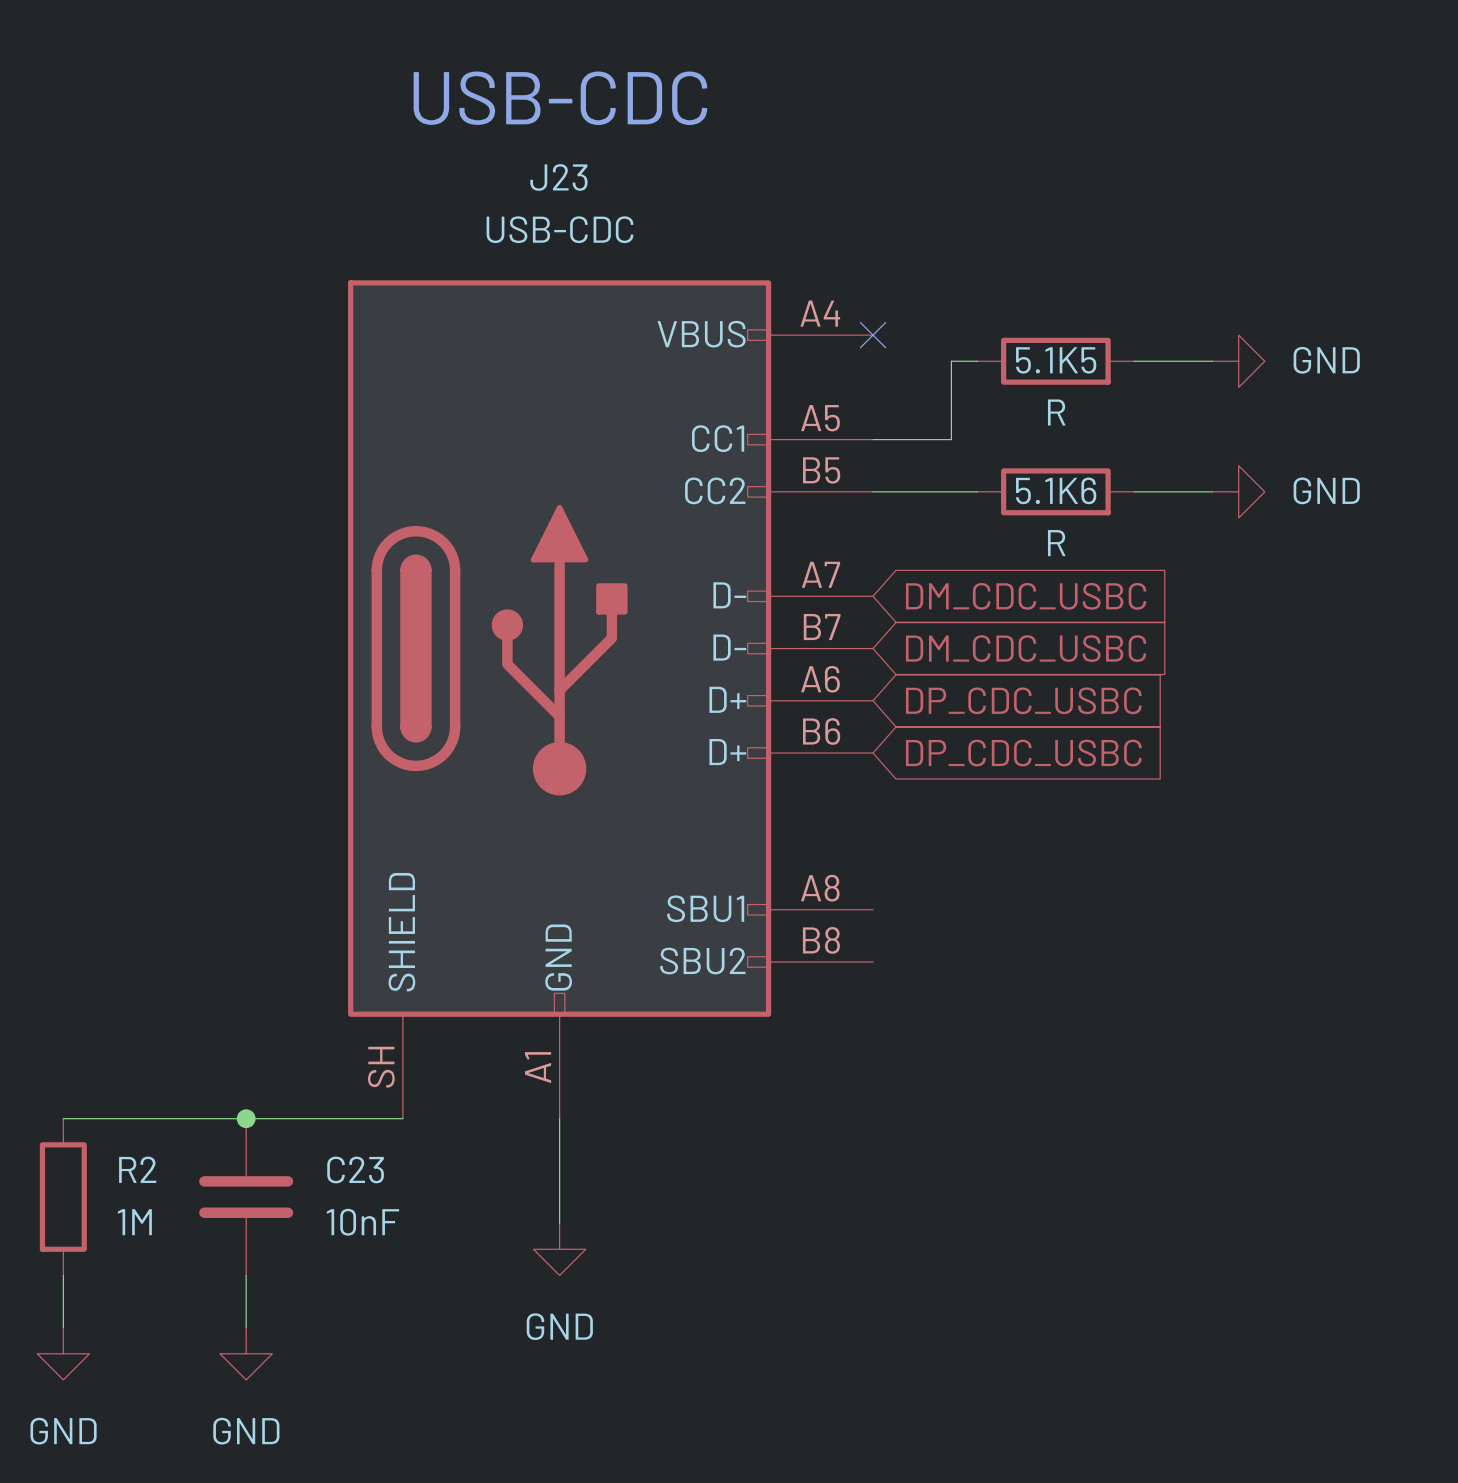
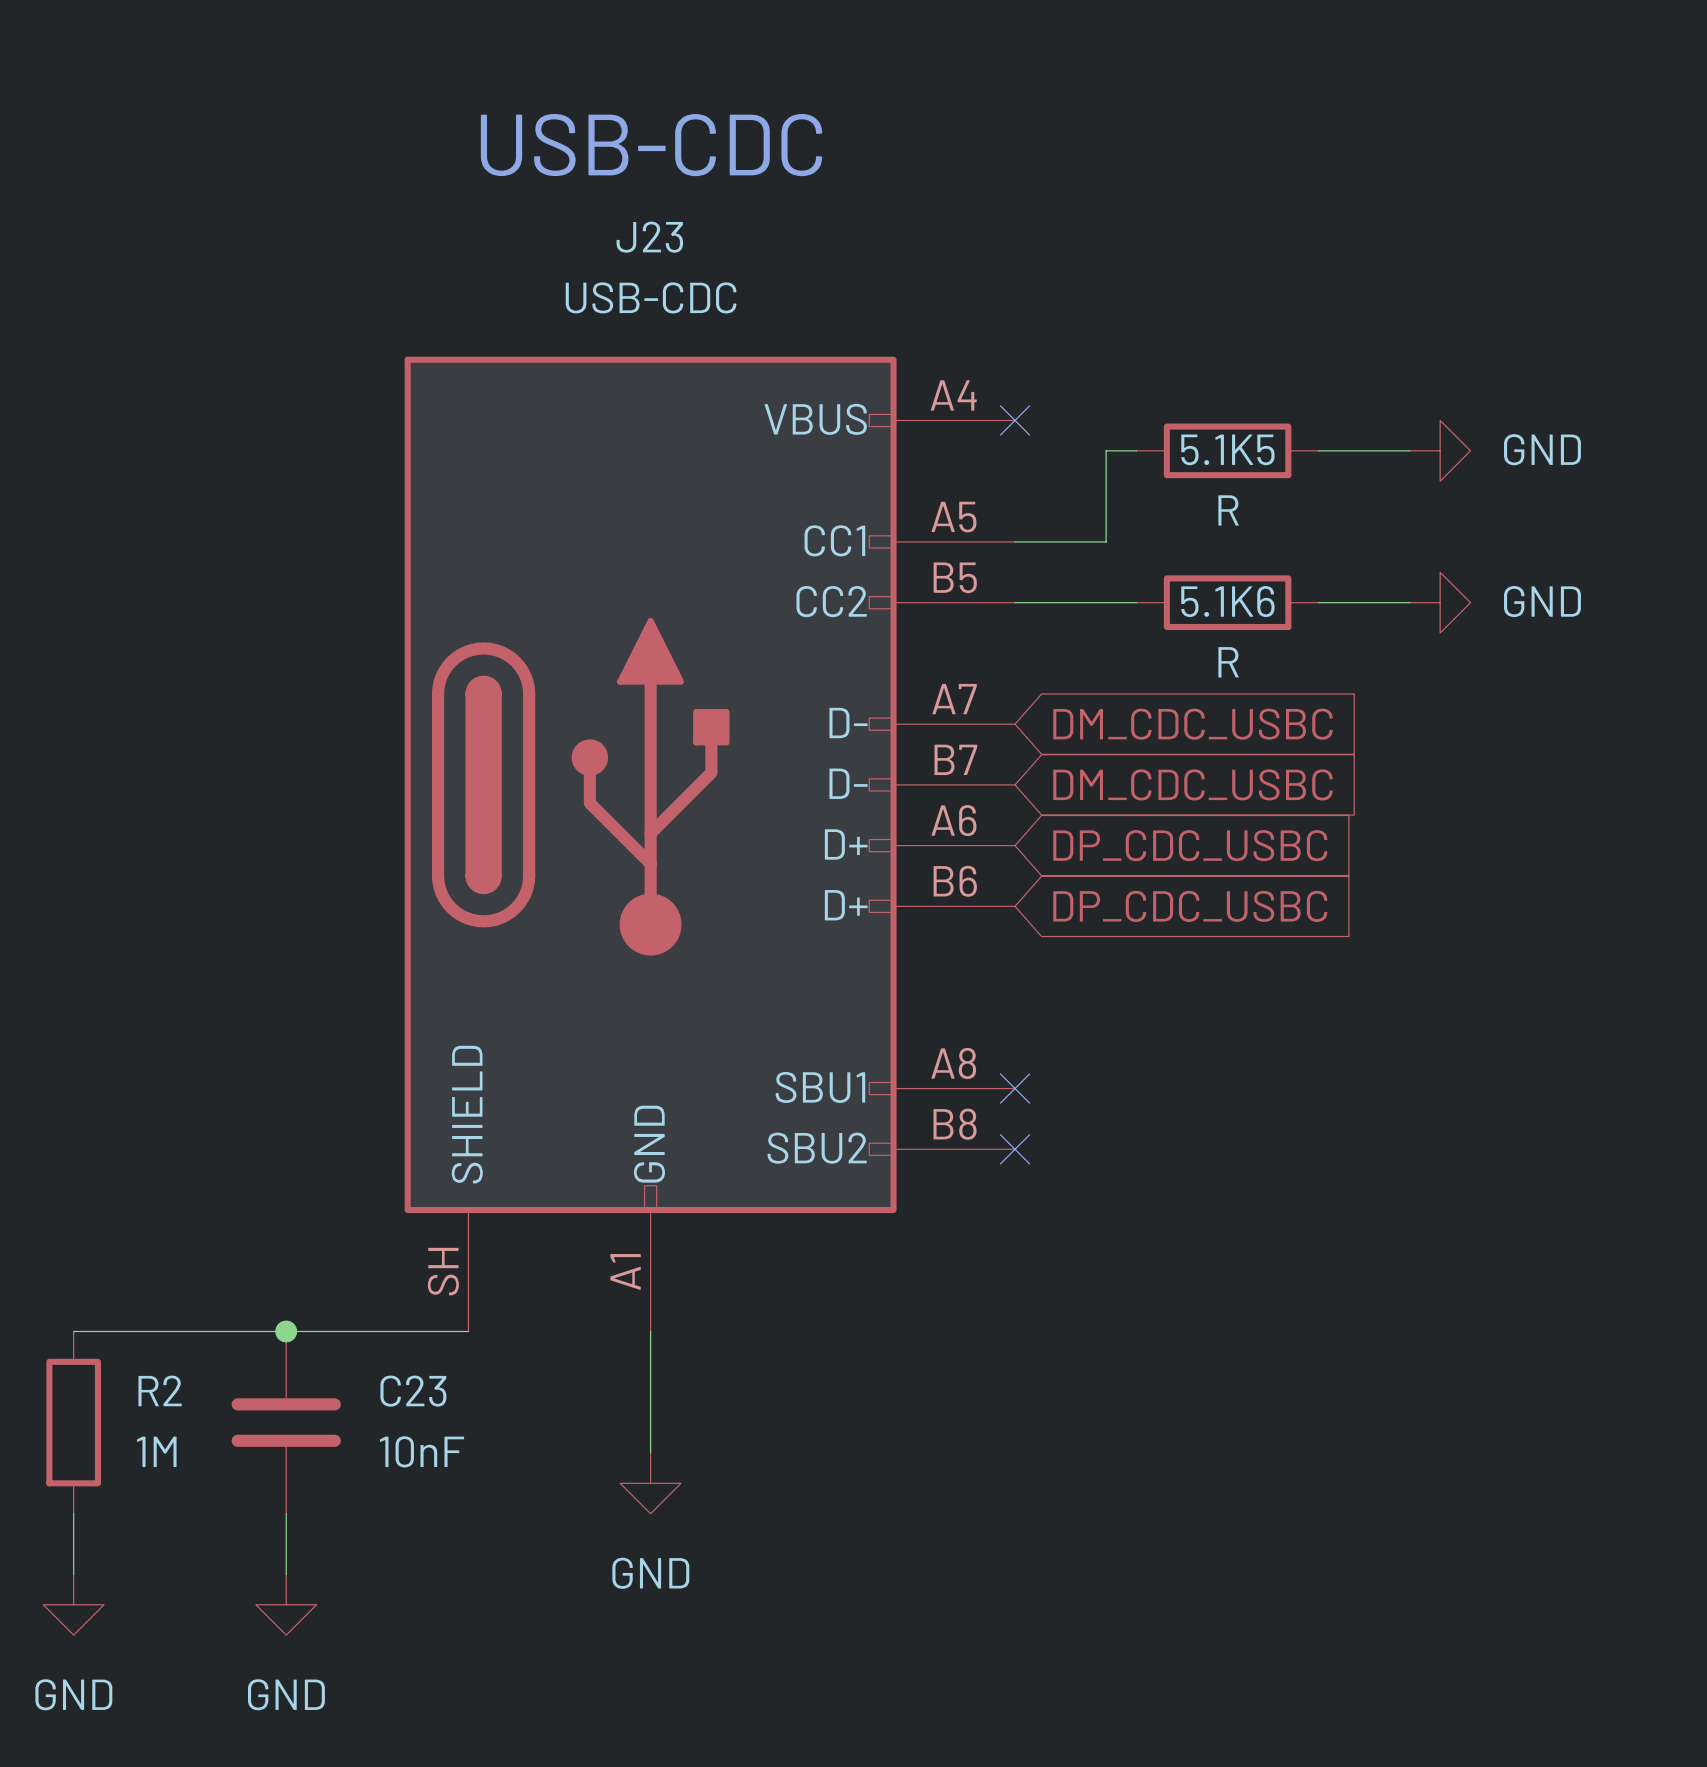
no-connect mark: none -> (1015, 1088)
no-connect mark: none -> (1015, 1149)

